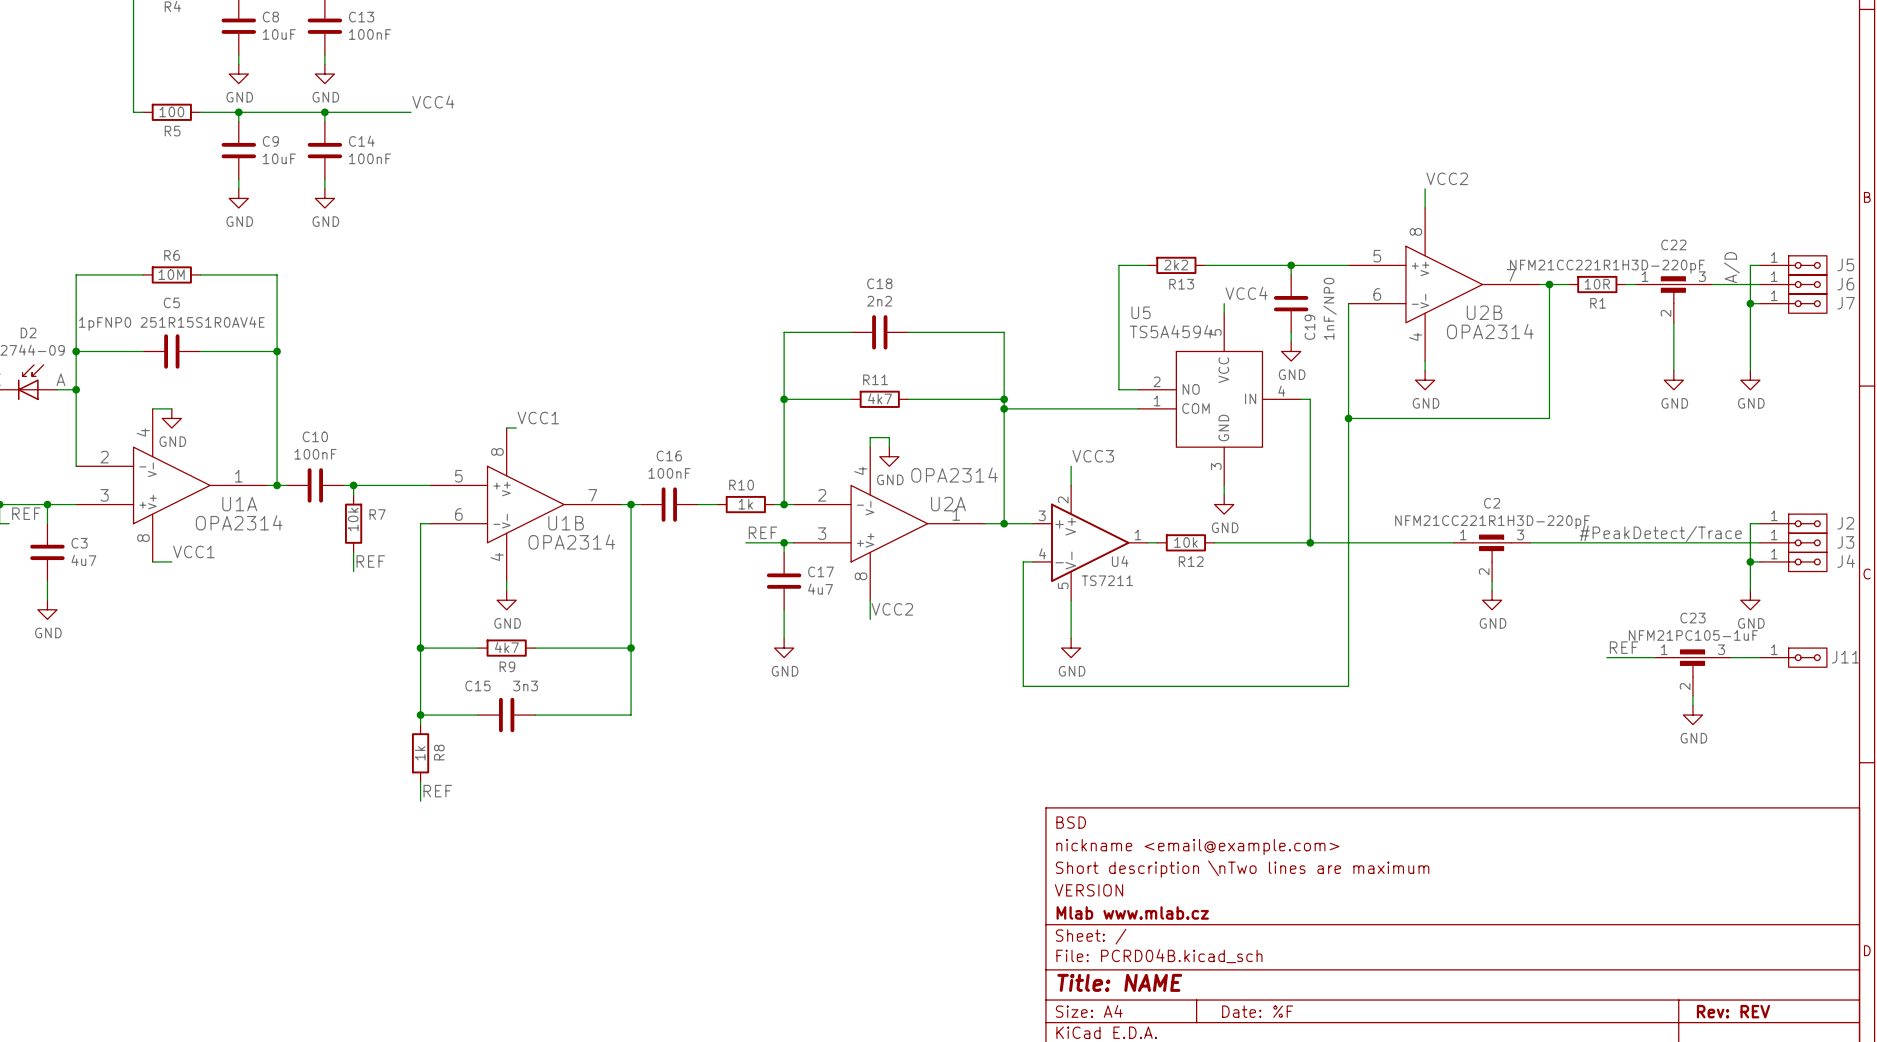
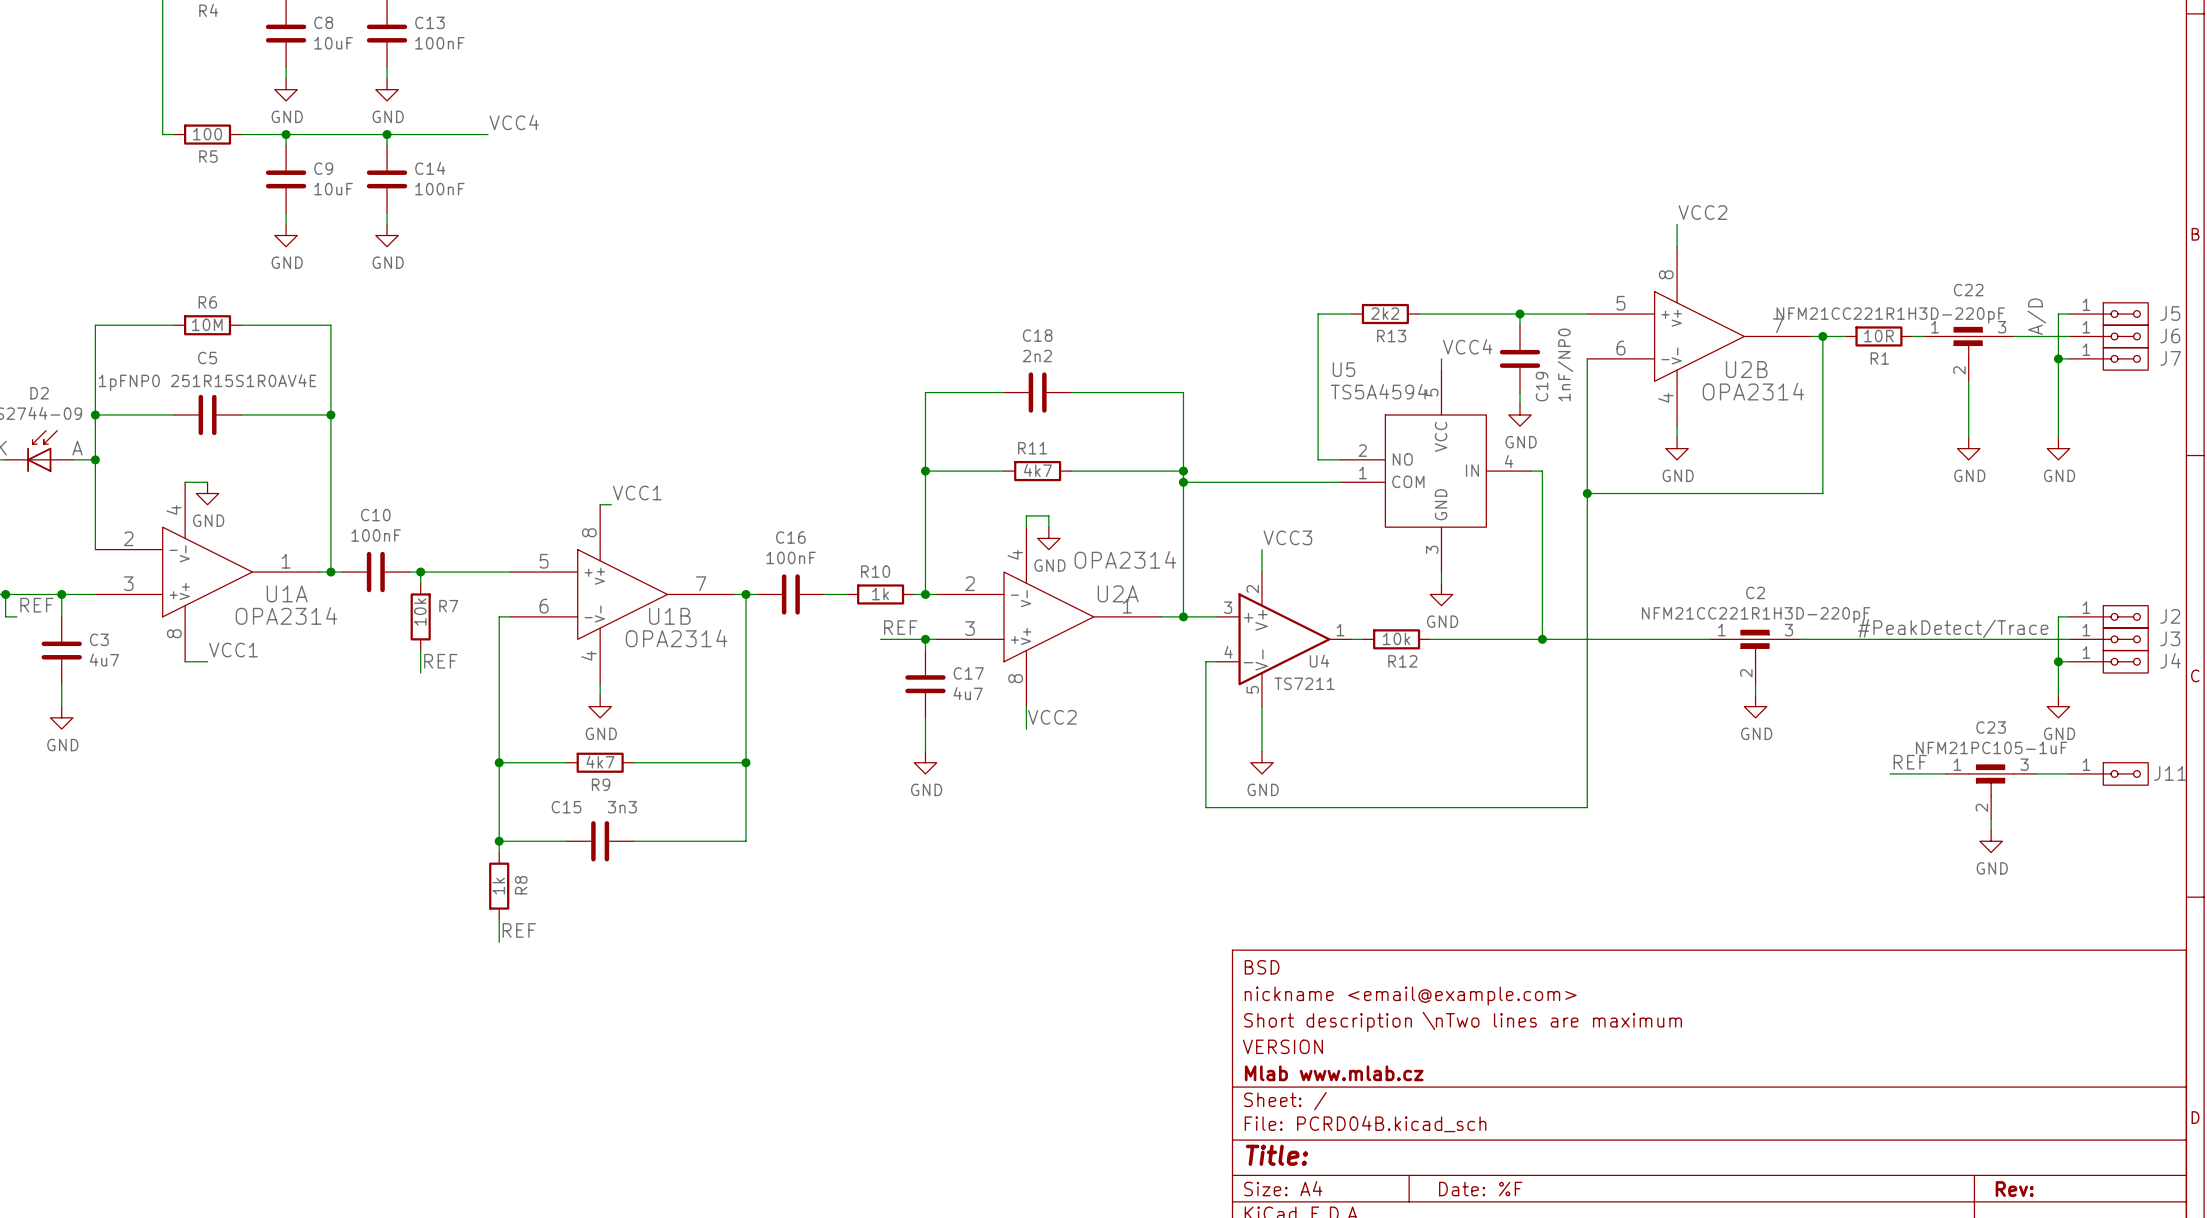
title block: Title: NAME (1119, 982) -> Title: (1276, 1155)
title block: Rev: REV (1733, 1011) -> Rev: (2014, 1189)

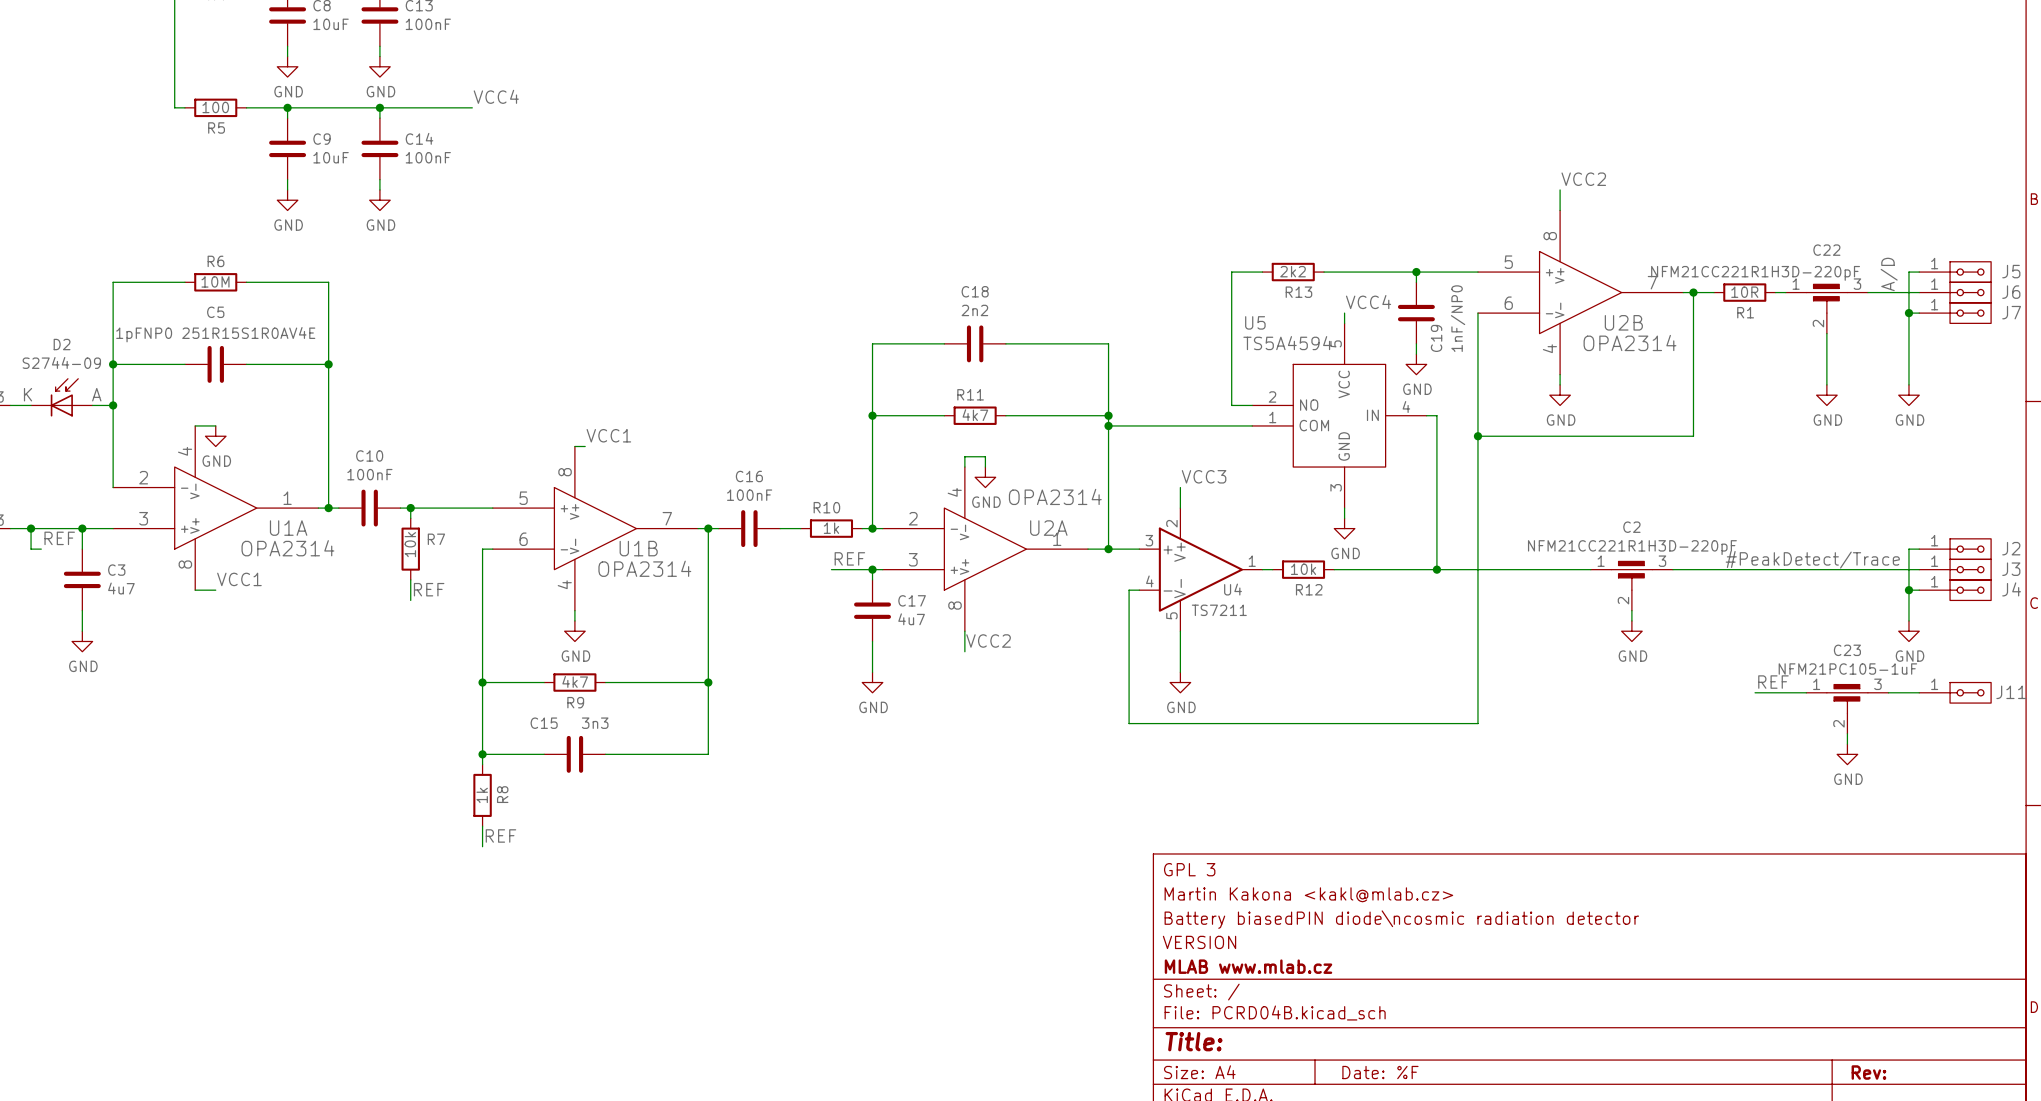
title block: BSD (1262, 967) -> GPL 3 (1189, 869)
title block: nickname <email@example.com> (1410, 996) -> Martin Kakona <kakl@mlab.cz> (1308, 894)
title block: Short description \nTwo lines are maximum (1463, 1021) -> Battery biasedPIN diode\ncosmic radiation detector (1401, 919)
title block: Mlab www.mlab.cz (1334, 1073) -> MLAB www.mlab.cz (1248, 966)

